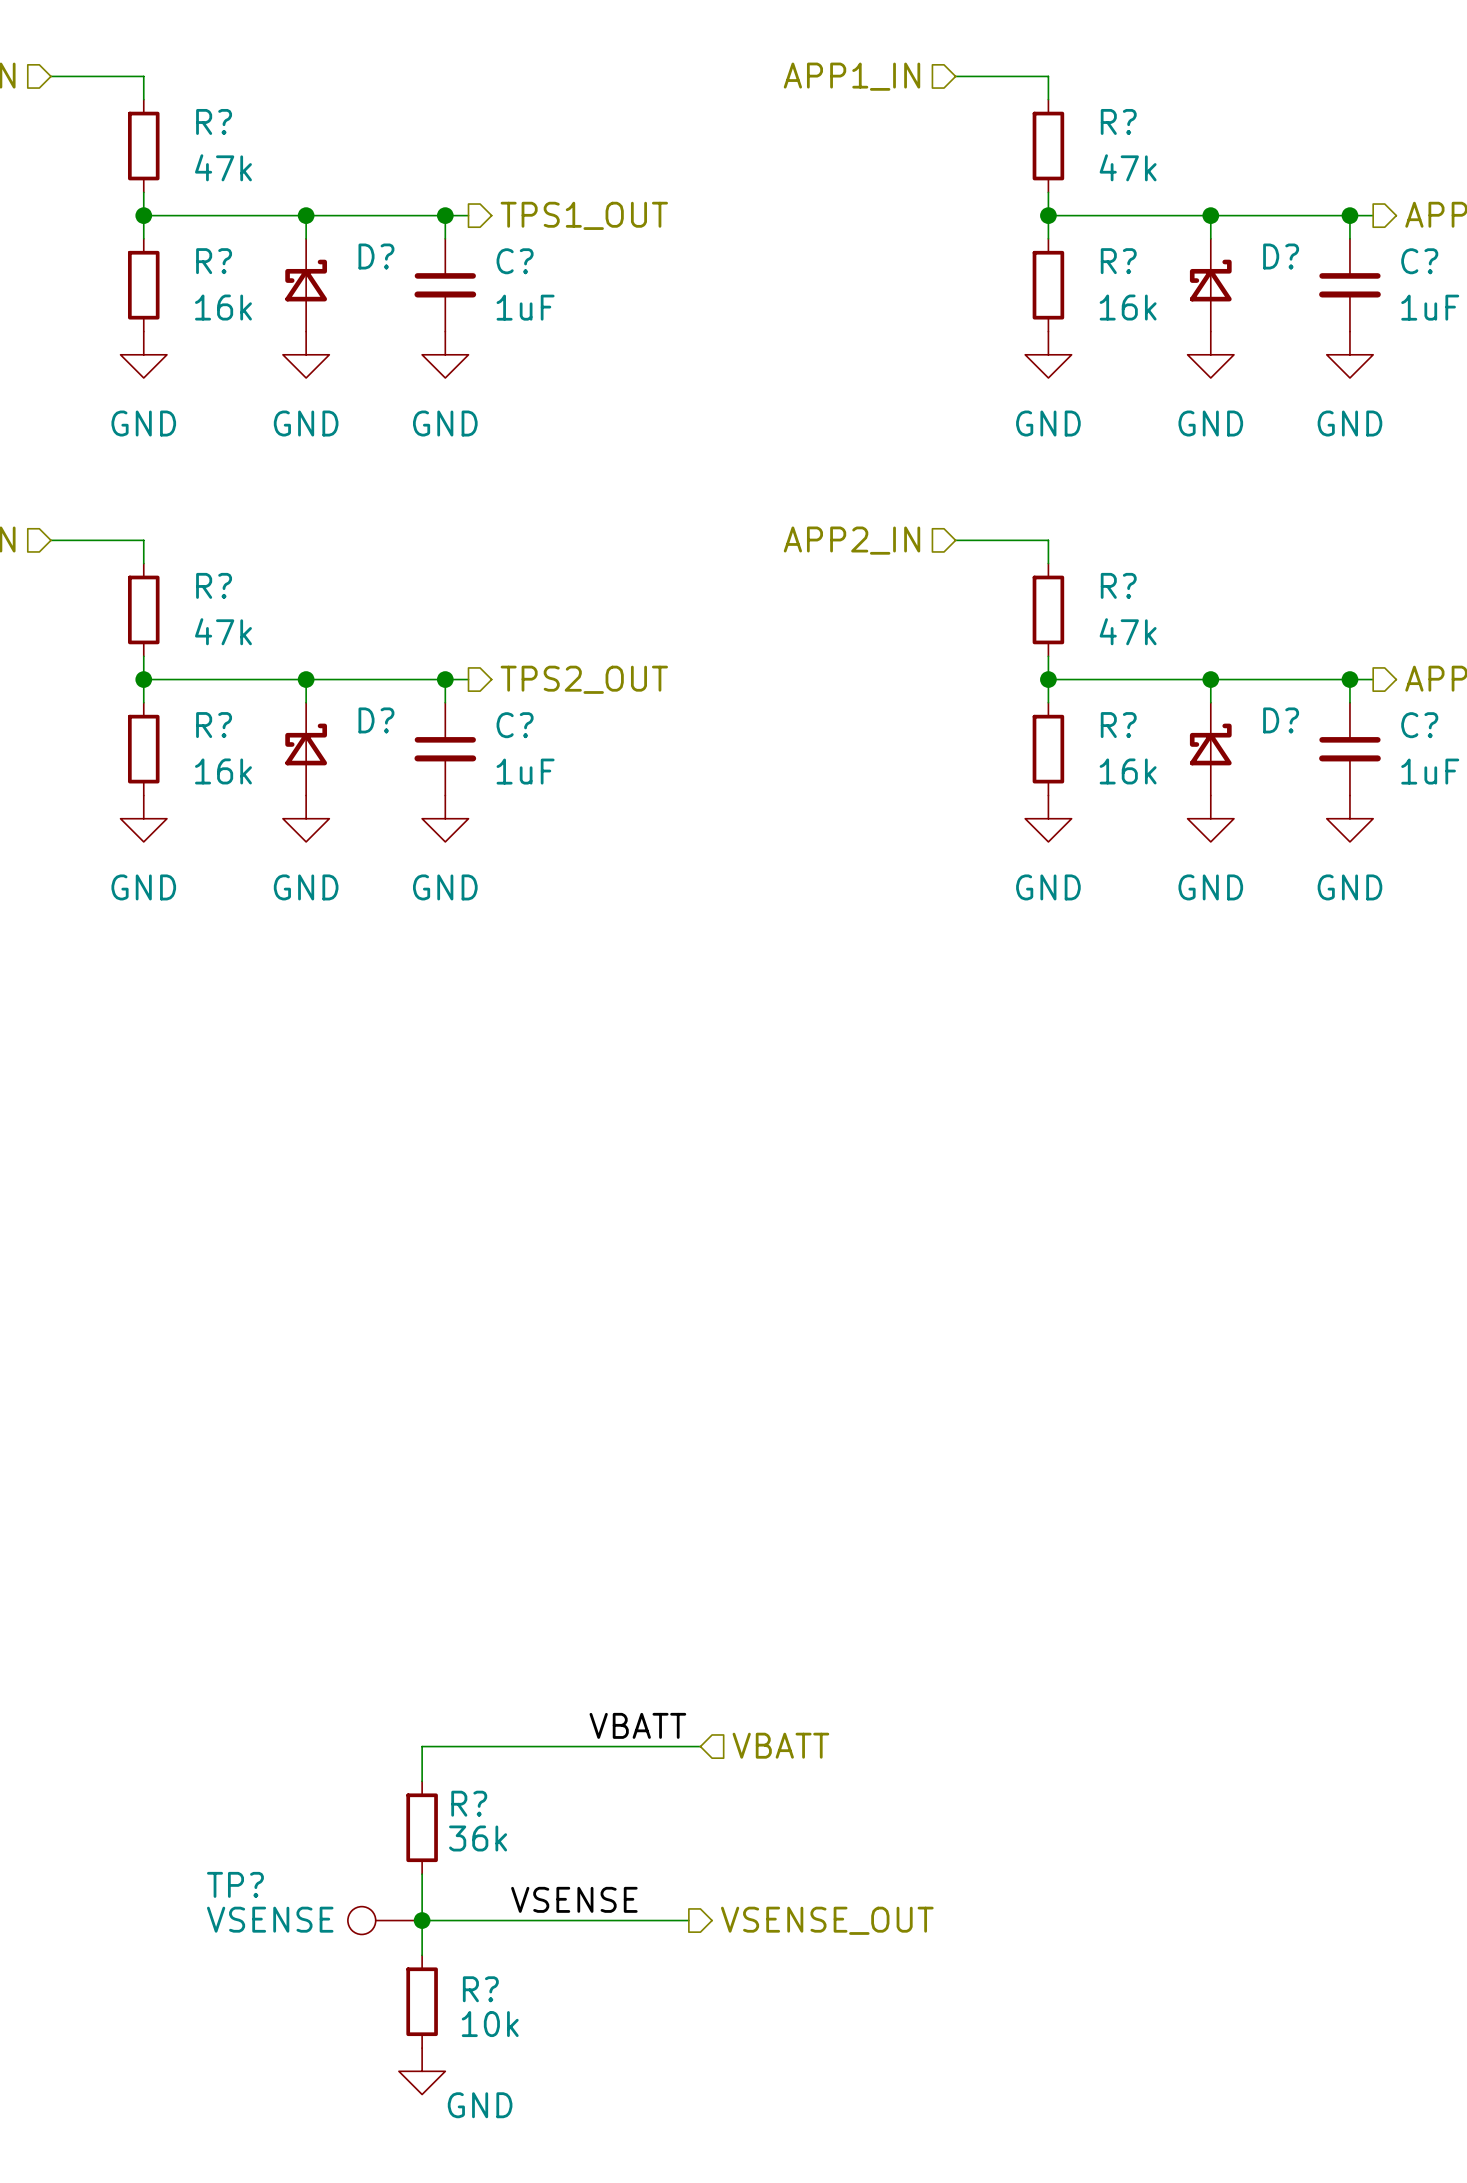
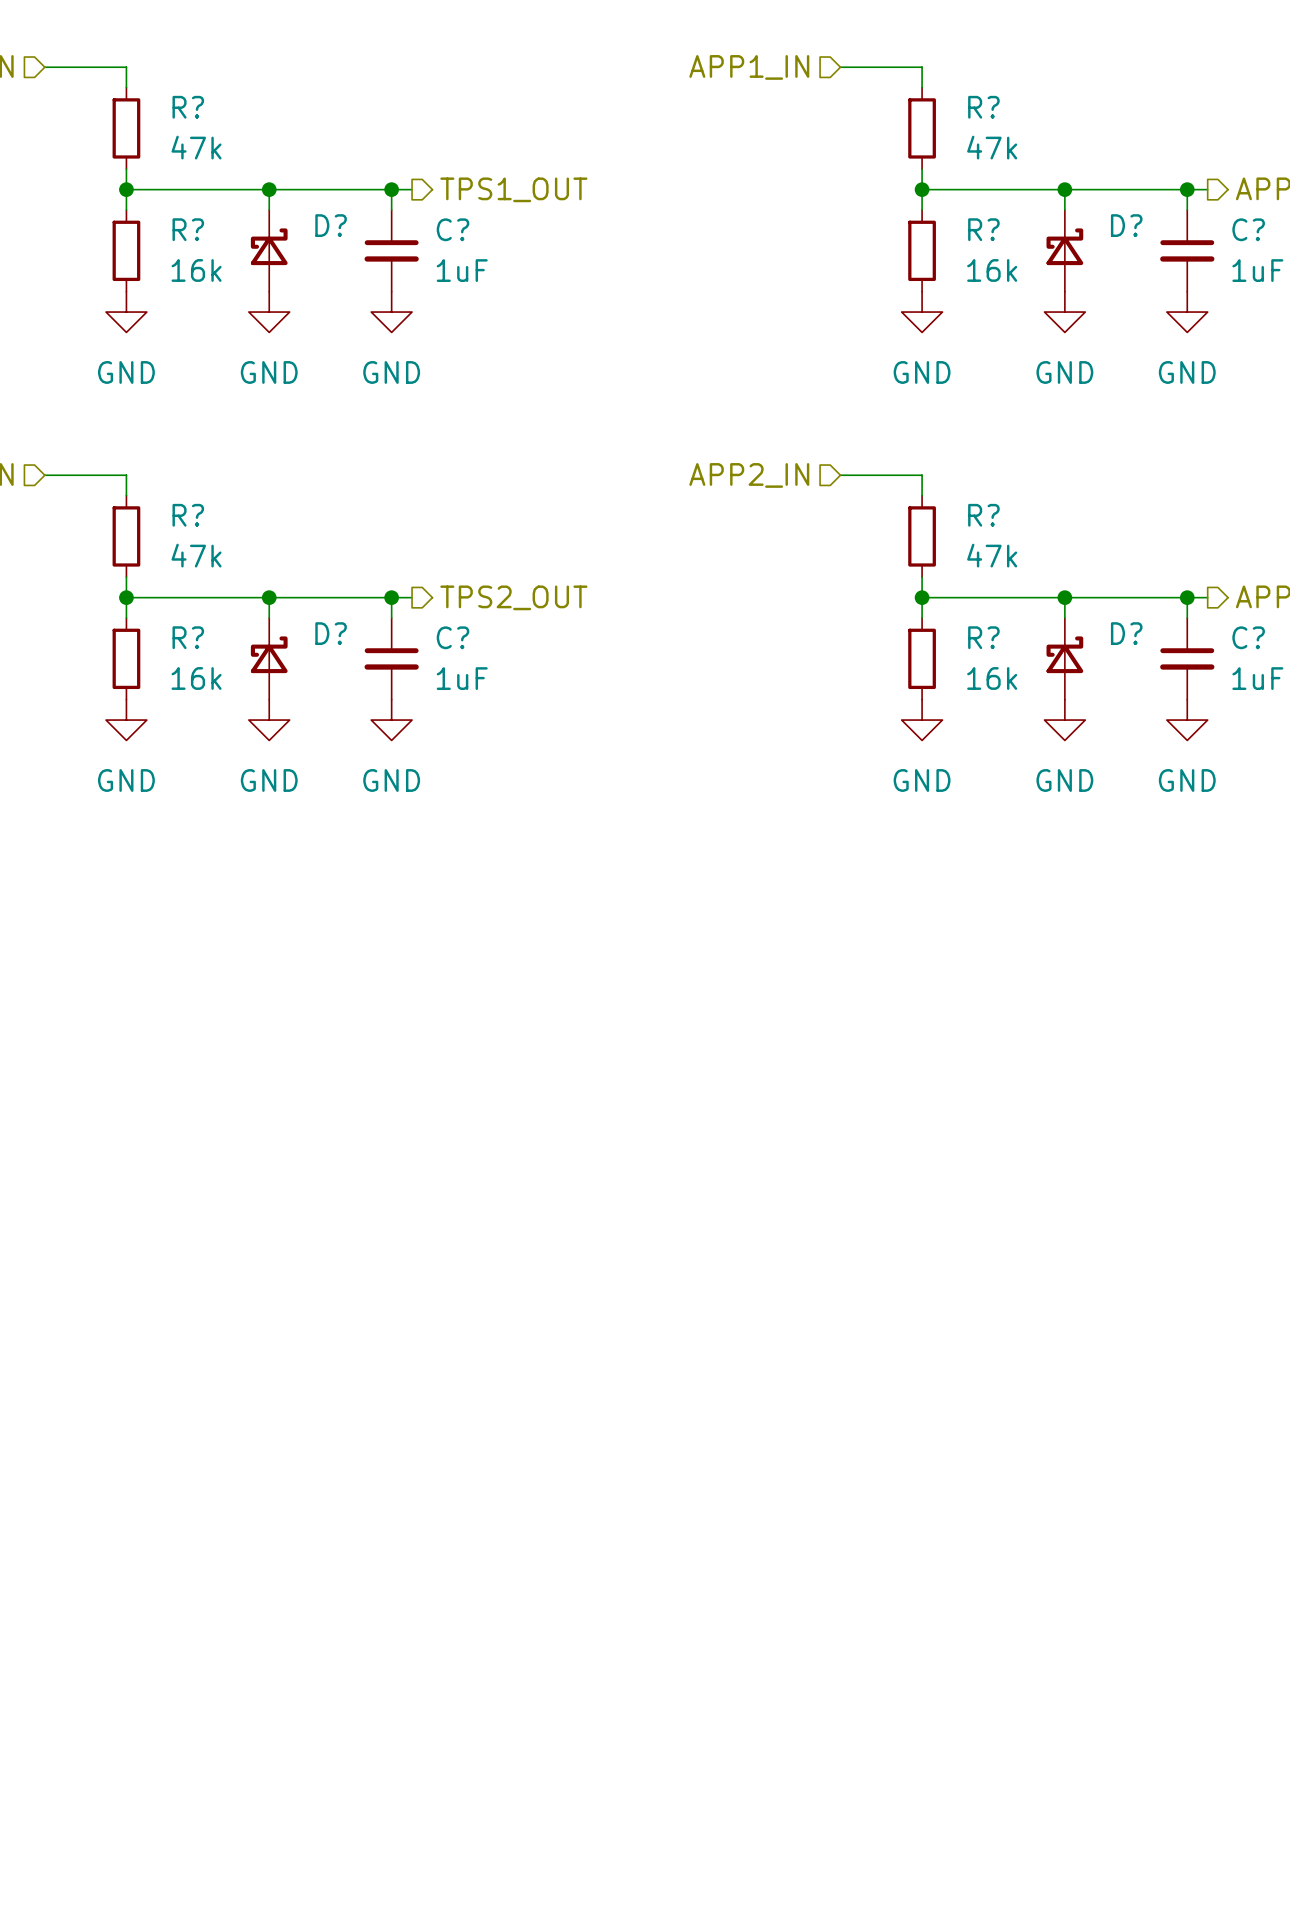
label: VBATT (637, 1725) -> none
hierarchical label: VBATT (780, 1745) -> none
wire: (700, 1746) (422, 1746) (422, 1781) -> none
R?: 36k (422, 1827) -> none
wire: (422, 1874) (422, 1955) -> none
label: VSENSE (574, 1899) -> none
TP?: VSENSE (385, 1920) -> none
wire: (422, 1920) (688, 1920) -> none
junction: (422, 1920) -> none
hierarchical label: VSENSE_OUT (827, 1920) -> none
R?: 10k (422, 2001) -> none
power symbol: GND (422, 2071) -> none

